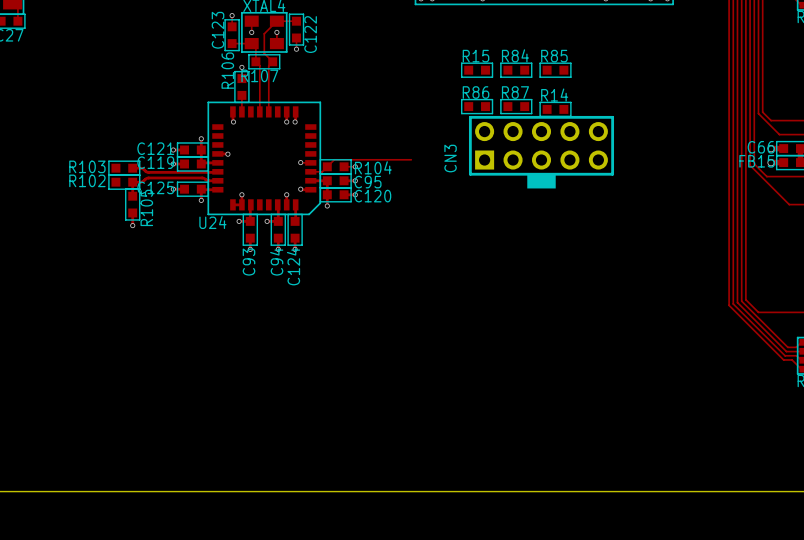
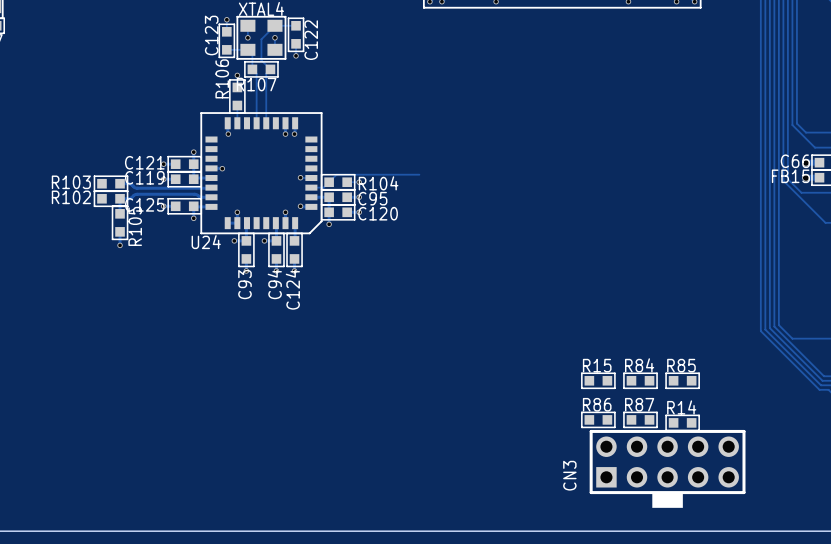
R15 position: (477, 70) -> (598, 380)
R84 position: (516, 70) -> (640, 380)
R85 position: (555, 70) -> (682, 380)
R86 position: (477, 106) -> (598, 419)
R87 position: (516, 106) -> (640, 419)
R14 position: (555, 109) -> (682, 422)
CN3 position: (541, 152) -> (667, 468)

